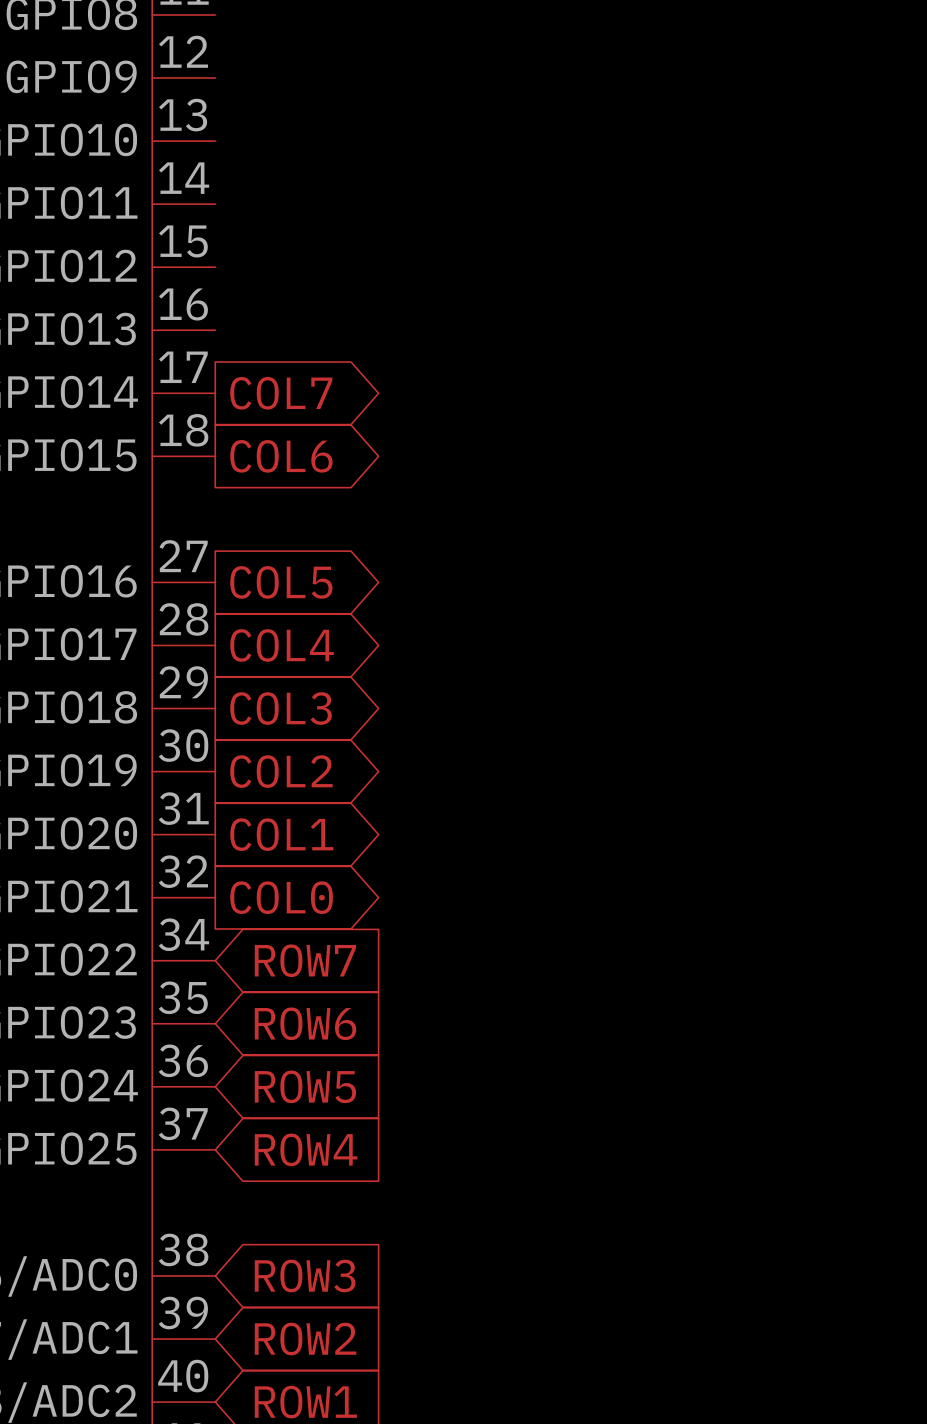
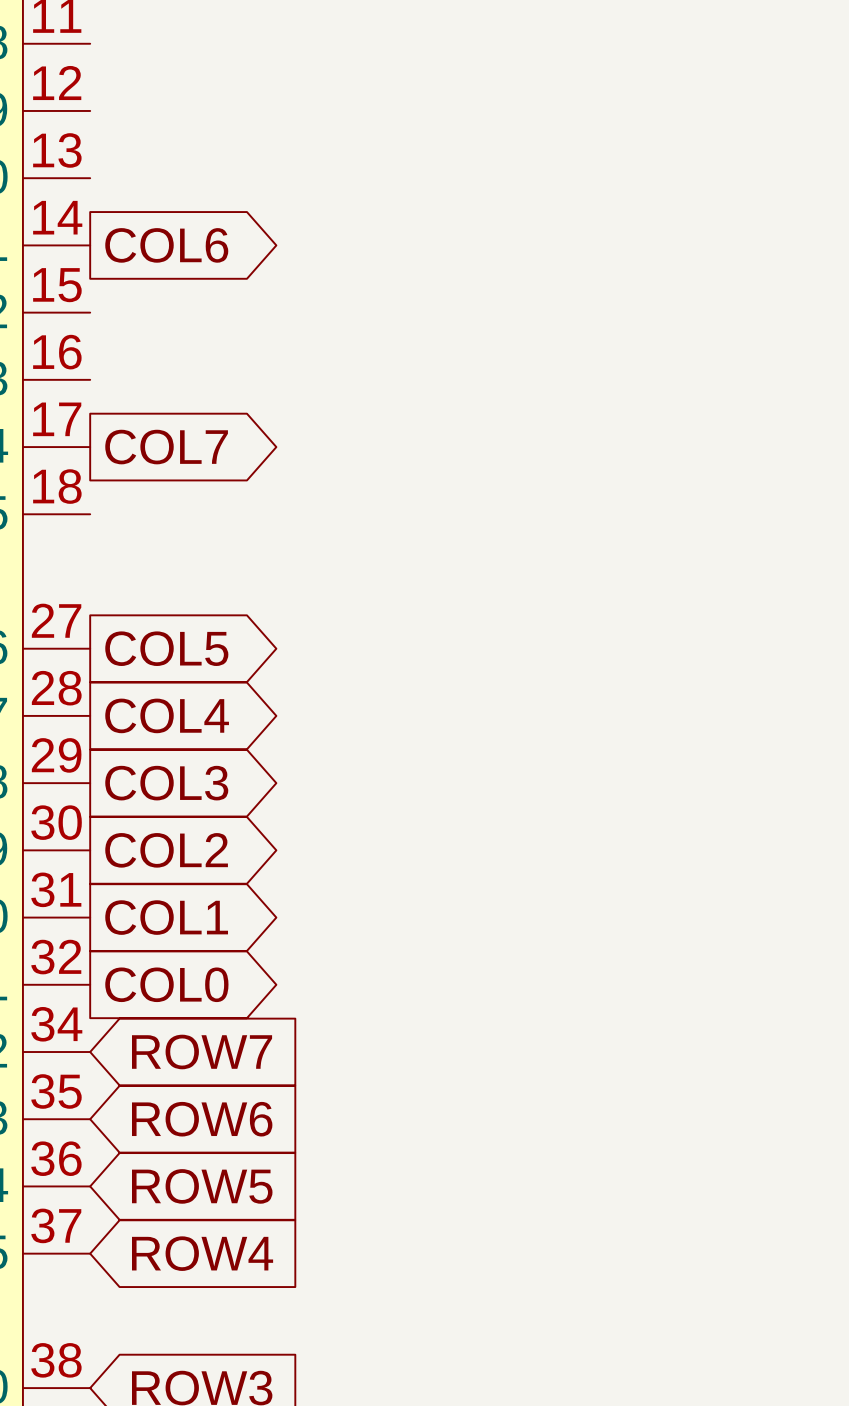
global label position: COL6 (281, 456) -> COL6 (166, 245)

